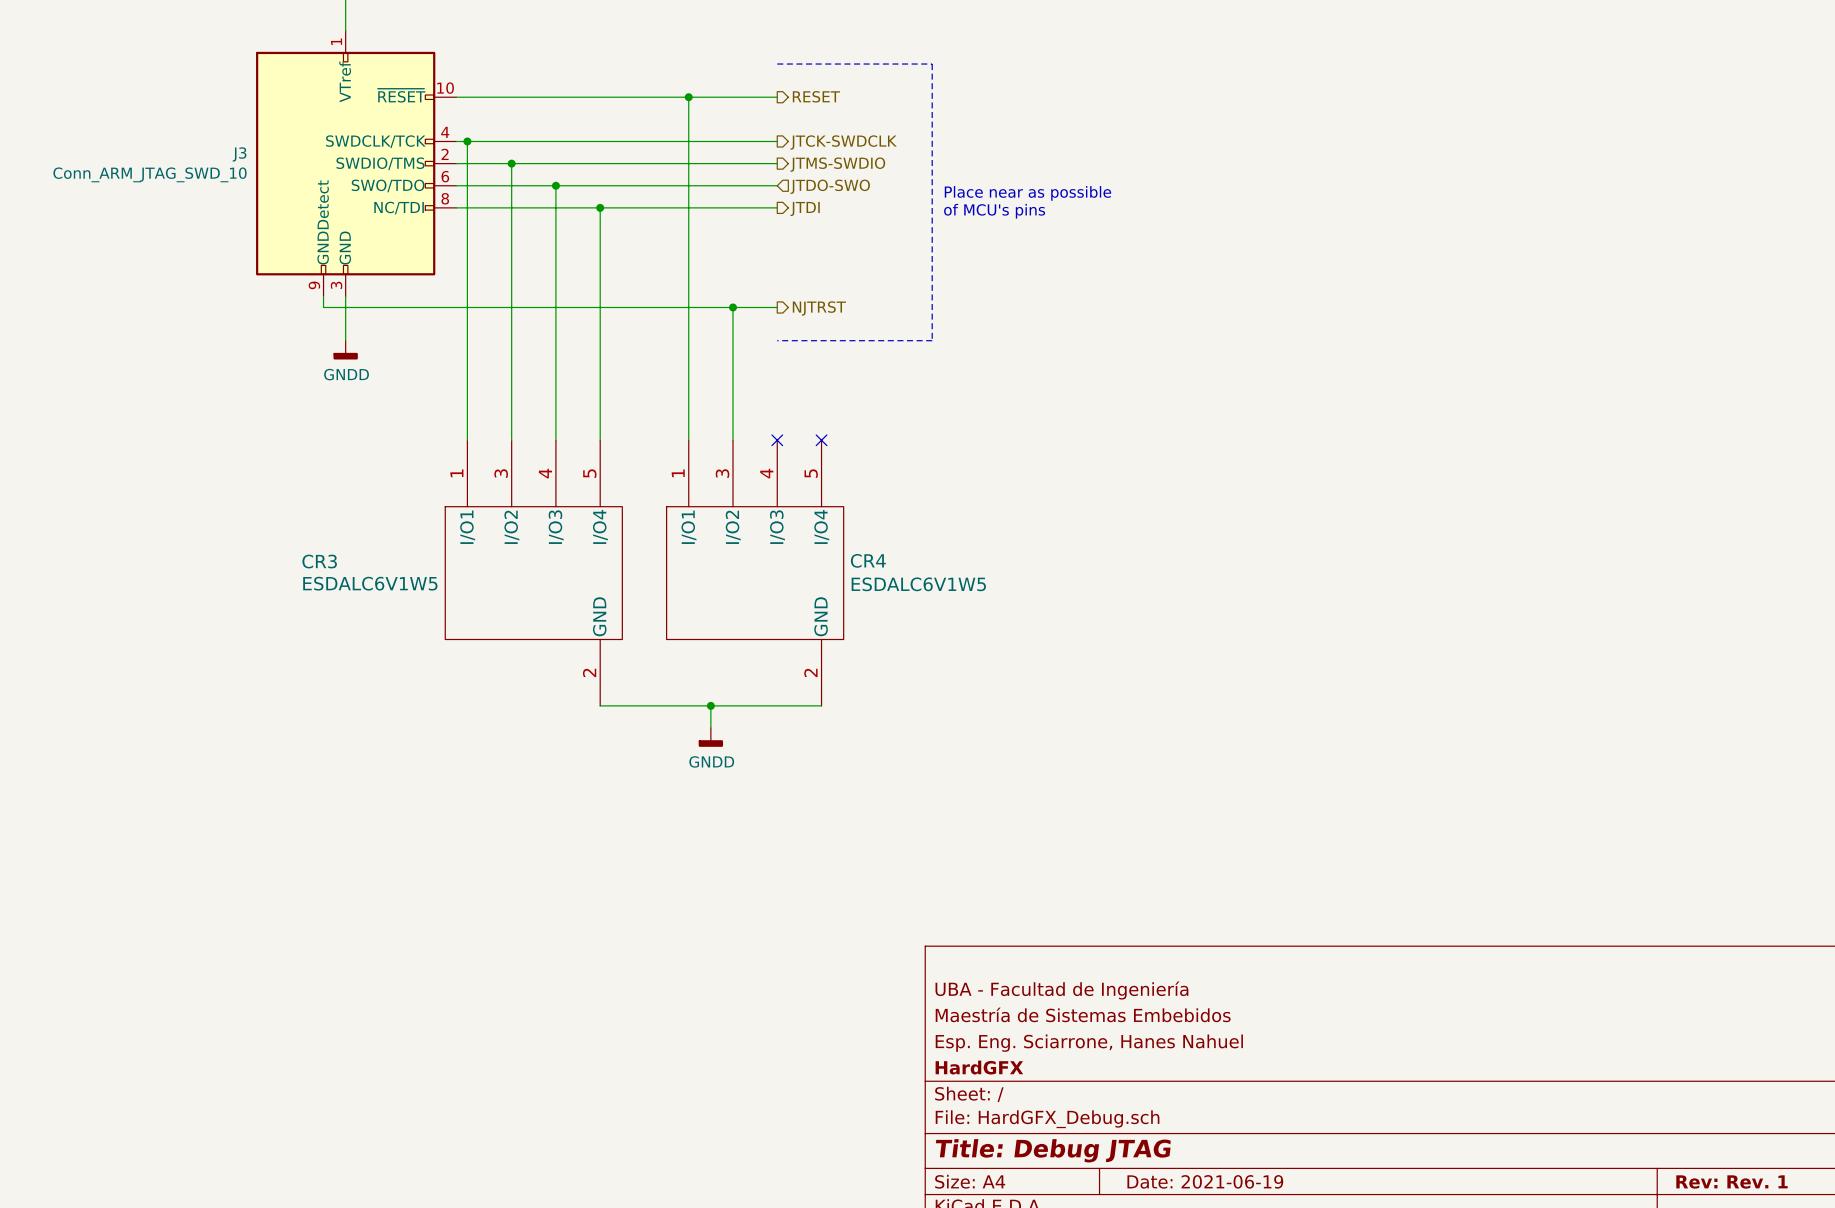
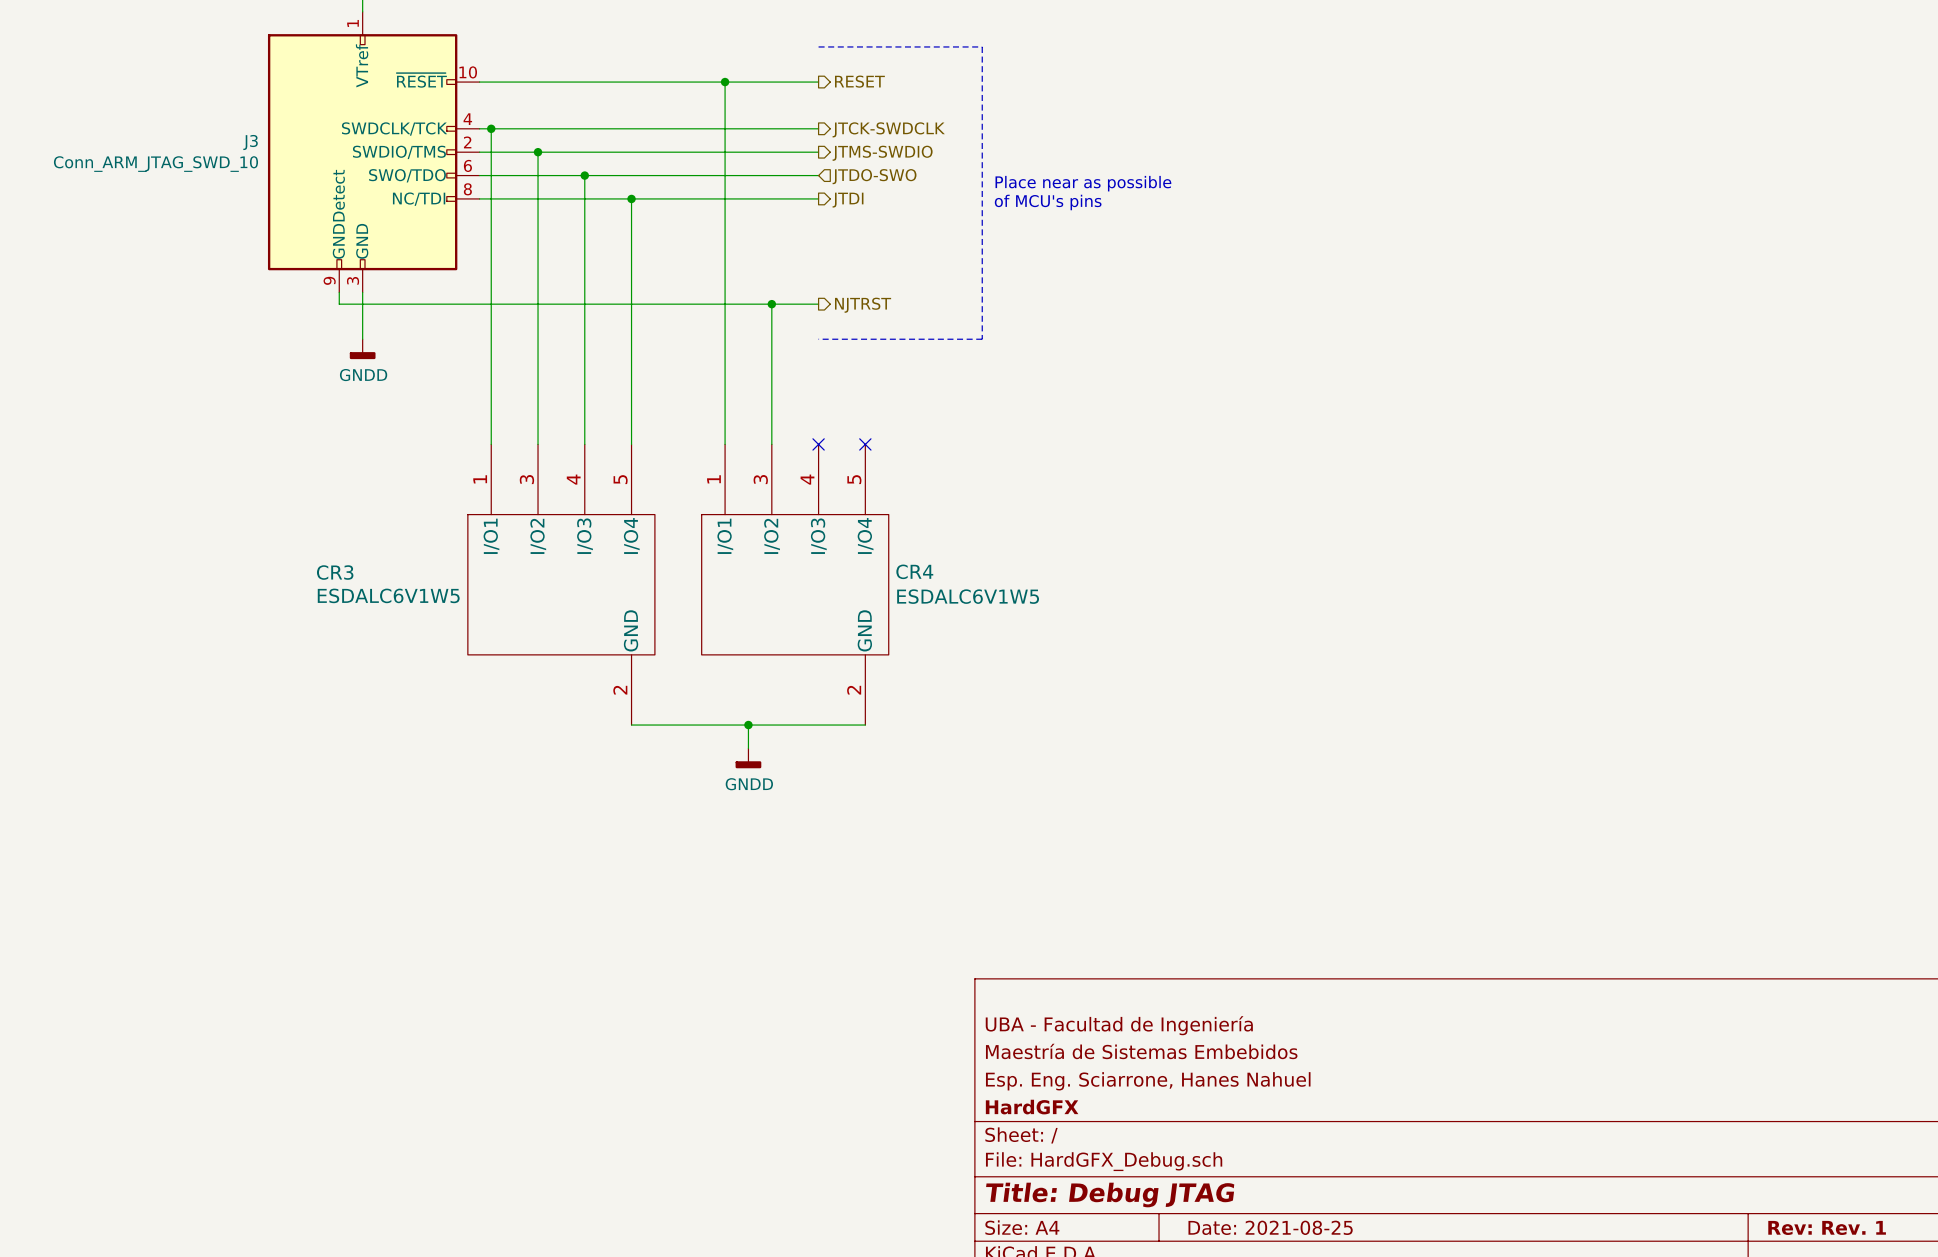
title block: Date: 2021-06-19 (1205, 1181) -> Date: 2021-08-25 (1270, 1227)

